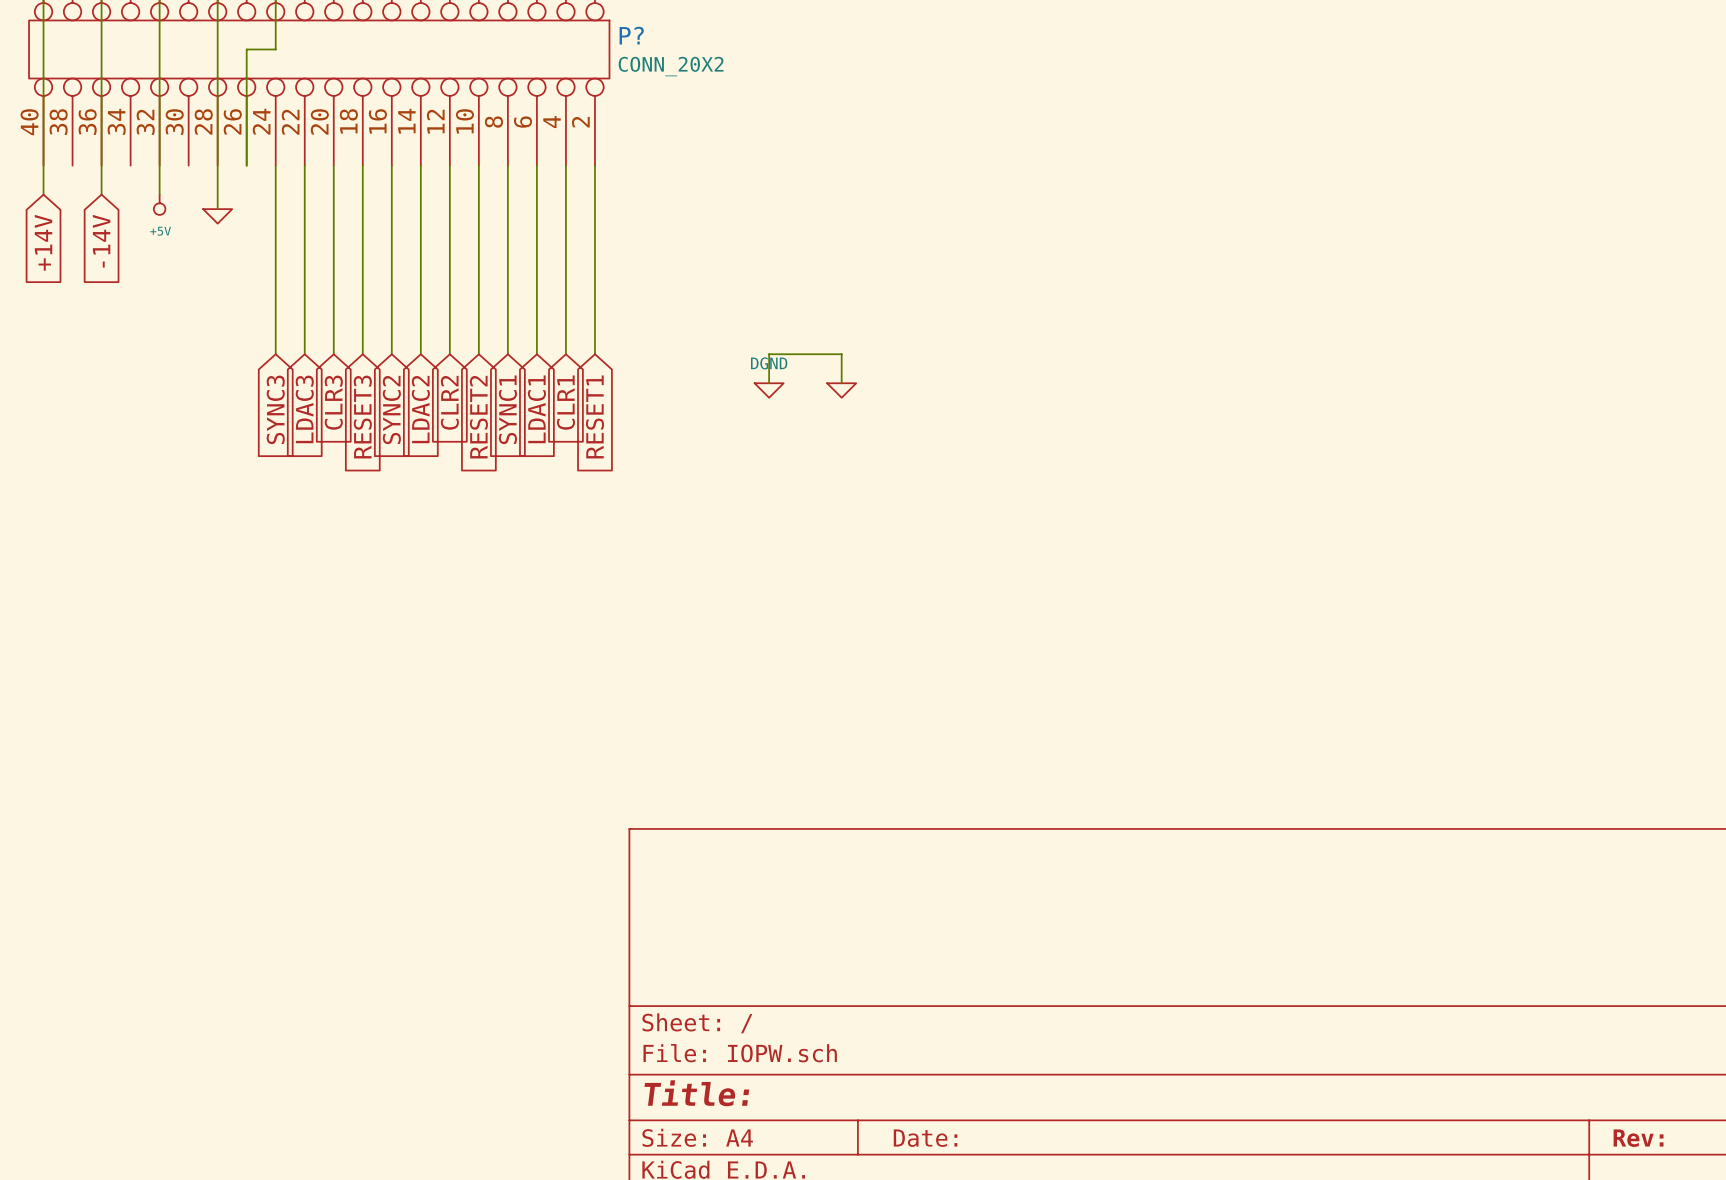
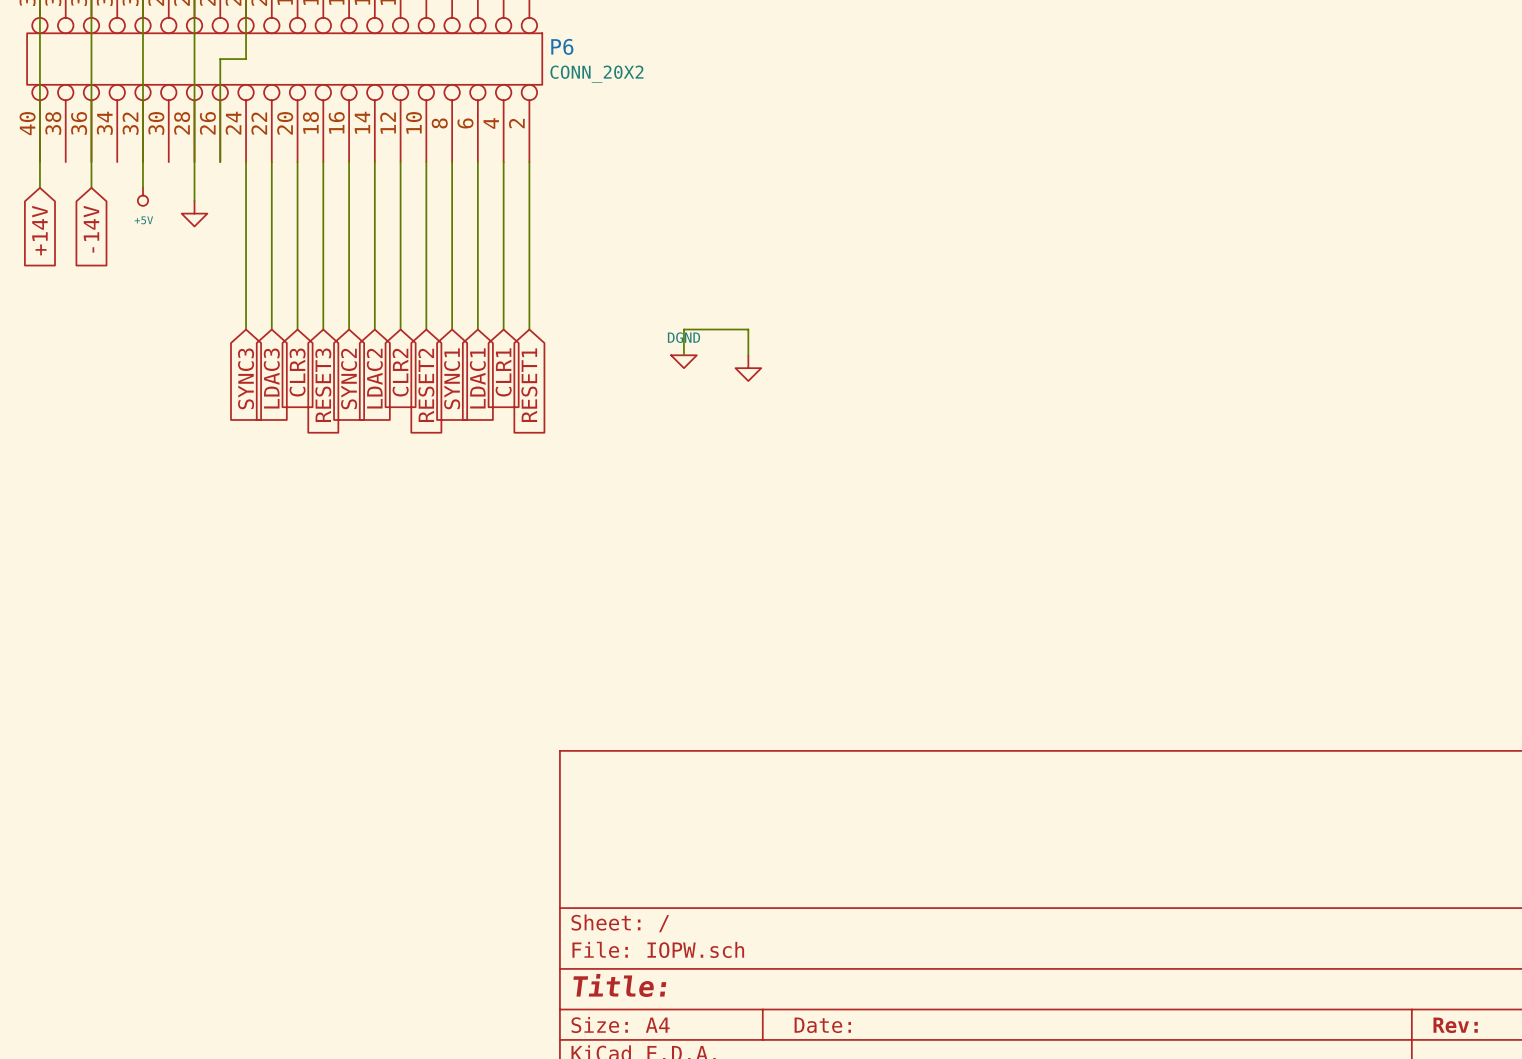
P? name: P? (631, 35) -> P6 (562, 46)
power symbol shape: [203, 209, 233, 224] -> [181, 200, 208, 227]
power symbol shape: [827, 383, 857, 398] -> [735, 355, 762, 382]

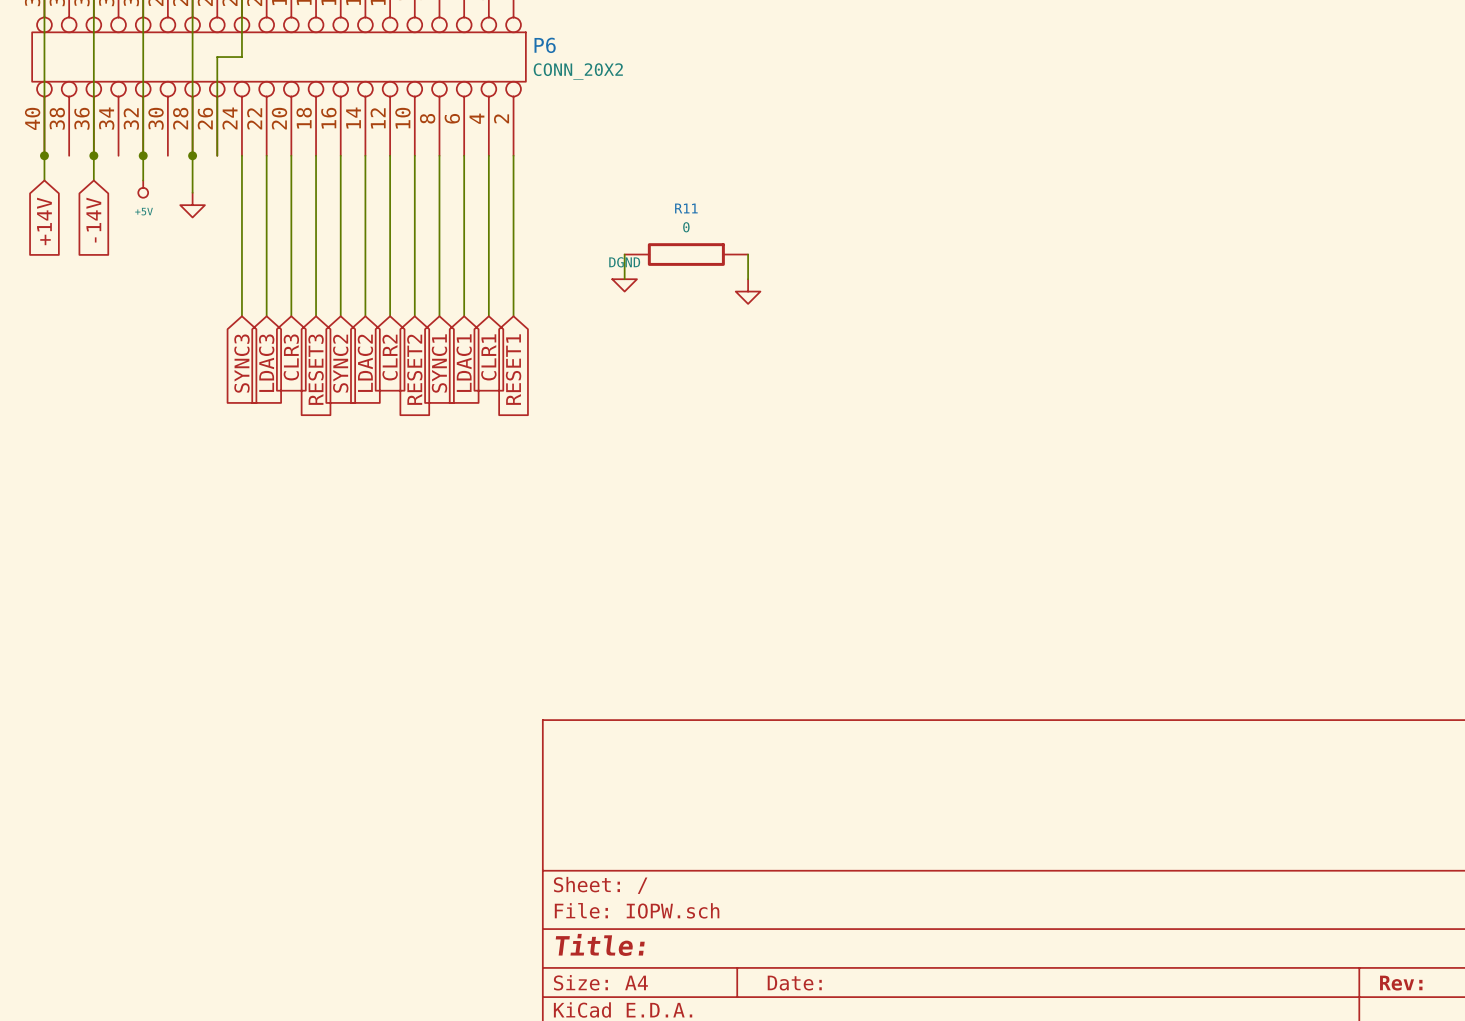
junction: none -> (44, 155)
junction: none -> (93, 155)
junction: none -> (143, 155)
junction: none -> (192, 155)
wire: none -> (624, 254) (624, 279)
R11: none -> 0 (686, 254)
wire: none -> (748, 254) (748, 279)
wire: (683, 355) (683, 329) (748, 329) (748, 355) -> none
power symbol position: DGND (683, 361) -> DGND (624, 285)
power symbol position: (748, 368) -> (748, 291)

